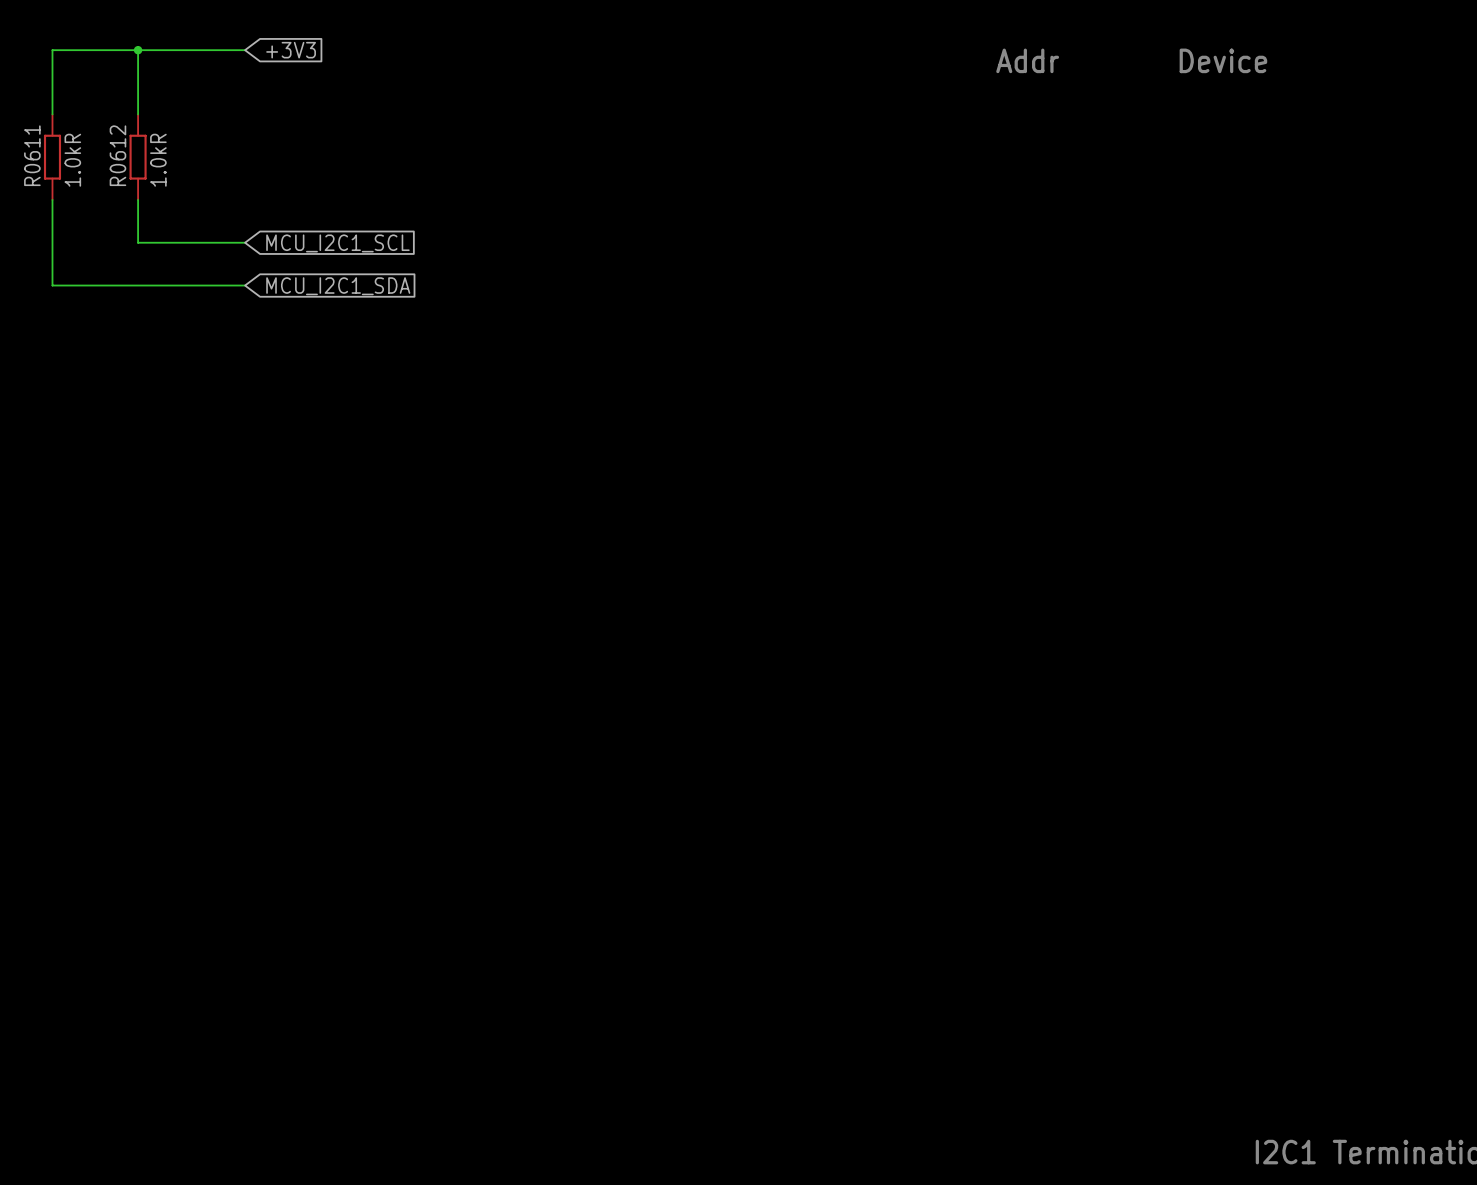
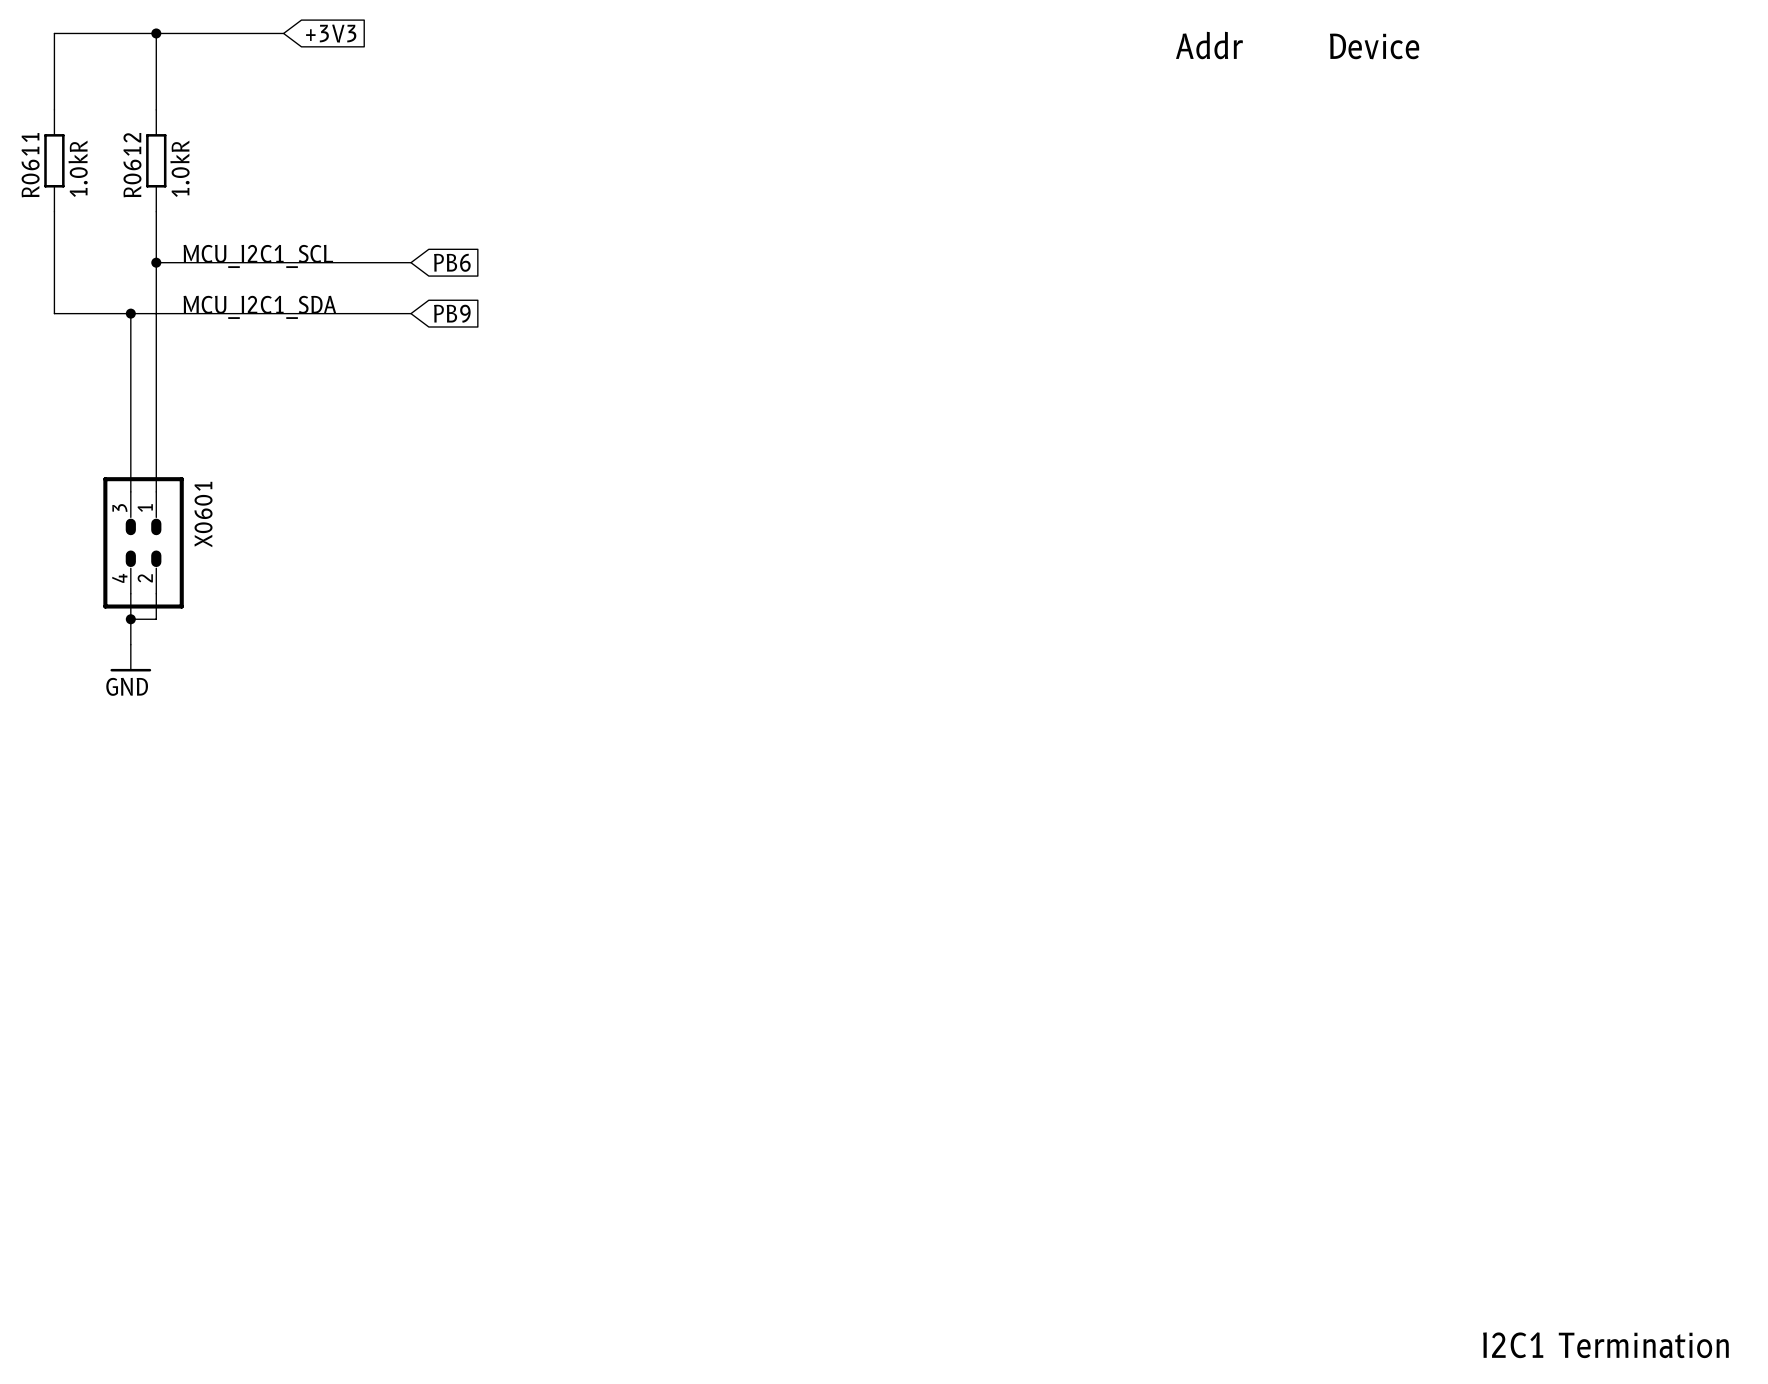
text: none -> MCU_I2C1_SCL (258, 256)
wire: none -> (156, 262) (156, 491)
junction: none -> (156, 262)
wire: none -> (283, 262) (410, 262)
global label: none -> PB6 (452, 262)
global label: MCU_I2C1_SCL (337, 243) -> none
text: none -> MCU_I2C1_SDA (259, 307)
wire: none -> (130, 313) (130, 491)
junction: none -> (130, 313)
wire: none -> (283, 313) (410, 313)
global label: none -> PB9 (452, 313)
global label: MCU_I2C1_SDA (338, 286) -> none
X0601: none -> (143, 542)
wire: none -> (130, 593) (130, 644)
wire: none -> (156, 593) (156, 619) (130, 619)
junction: none -> (130, 619)
power symbol: none -> GND (130, 658)

